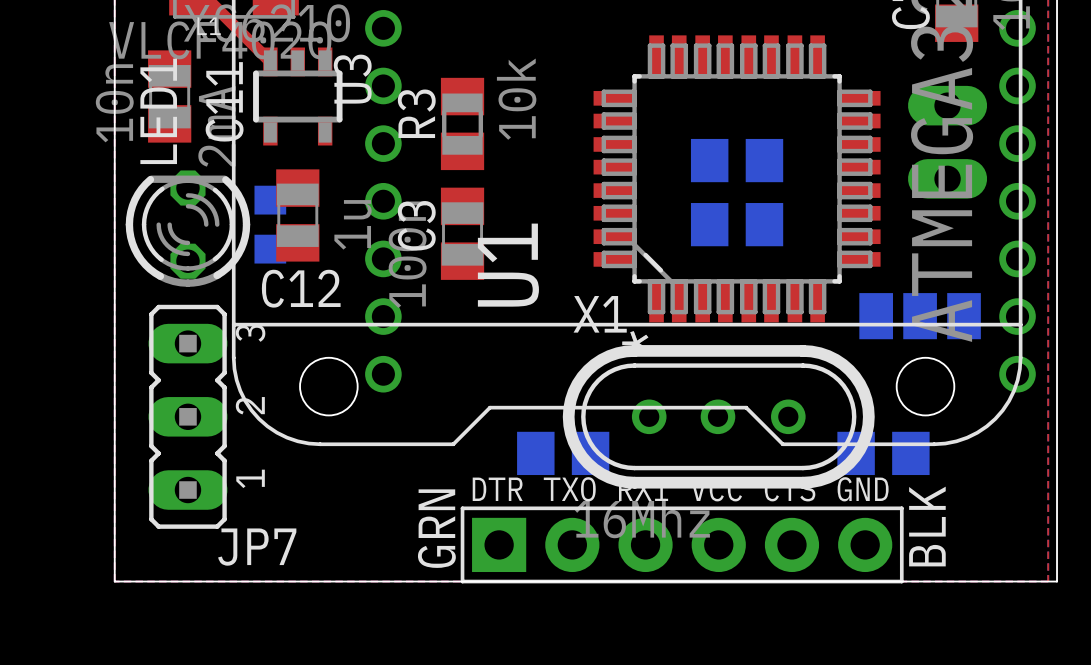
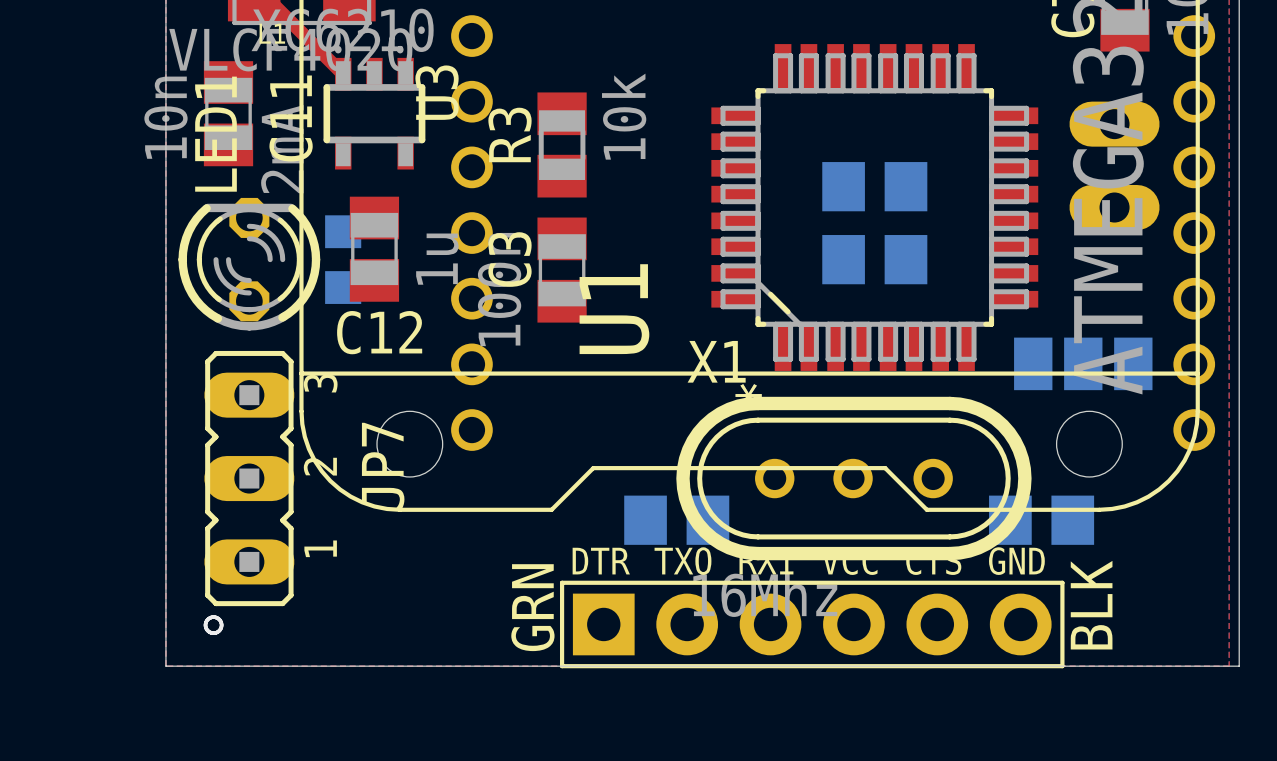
via: none -> (213, 625)
JP7 name rotation: 0° (257, 547) -> 90° counterclockwise (383, 465)
JP7 name position: JP7 (257, 547) -> JP7 (383, 465)

